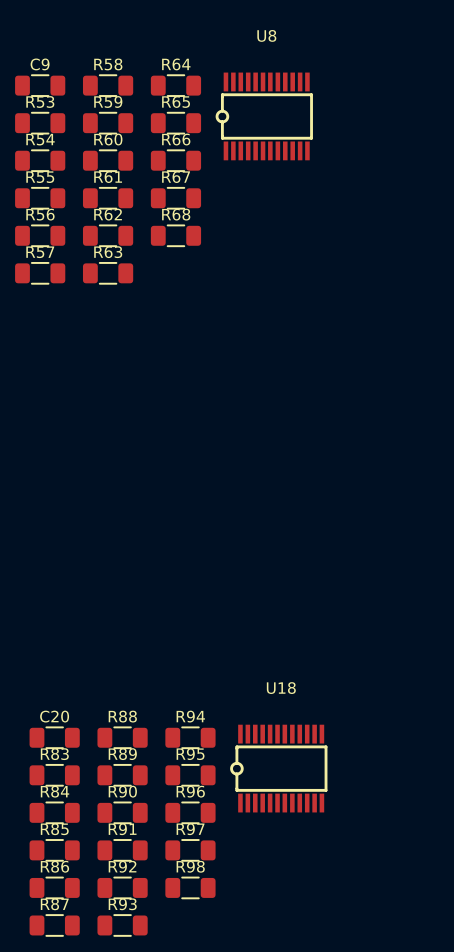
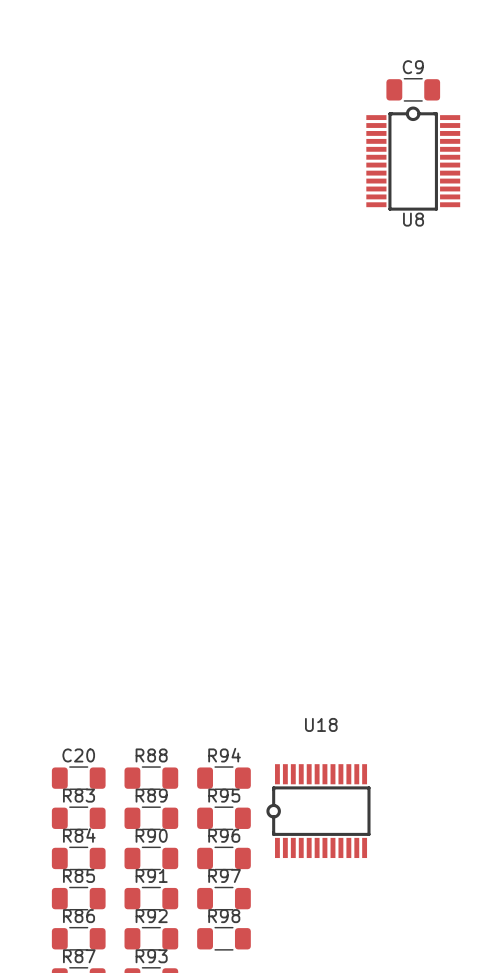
U8 name position: U8 (266, 35) -> U8 (413, 219)
C9 position: (40, 85) -> (413, 89)
R58: (108, 85) -> none
R64: (175, 85) -> none
U8 rotation: 0° (264, 116) -> 90° clockwise (413, 158)
U8 position: (264, 116) -> (413, 158)
R53: (40, 123) -> none
R59: (108, 123) -> none
R65: (175, 123) -> none
R54: (40, 160) -> none
R60: (108, 160) -> none
R66: (175, 160) -> none
R55: (40, 198) -> none
R61: (108, 198) -> none
R67: (175, 198) -> none
R56: (40, 235) -> none
R62: (108, 235) -> none
R68: (175, 235) -> none
R57: (40, 273) -> none
R63: (108, 273) -> none

